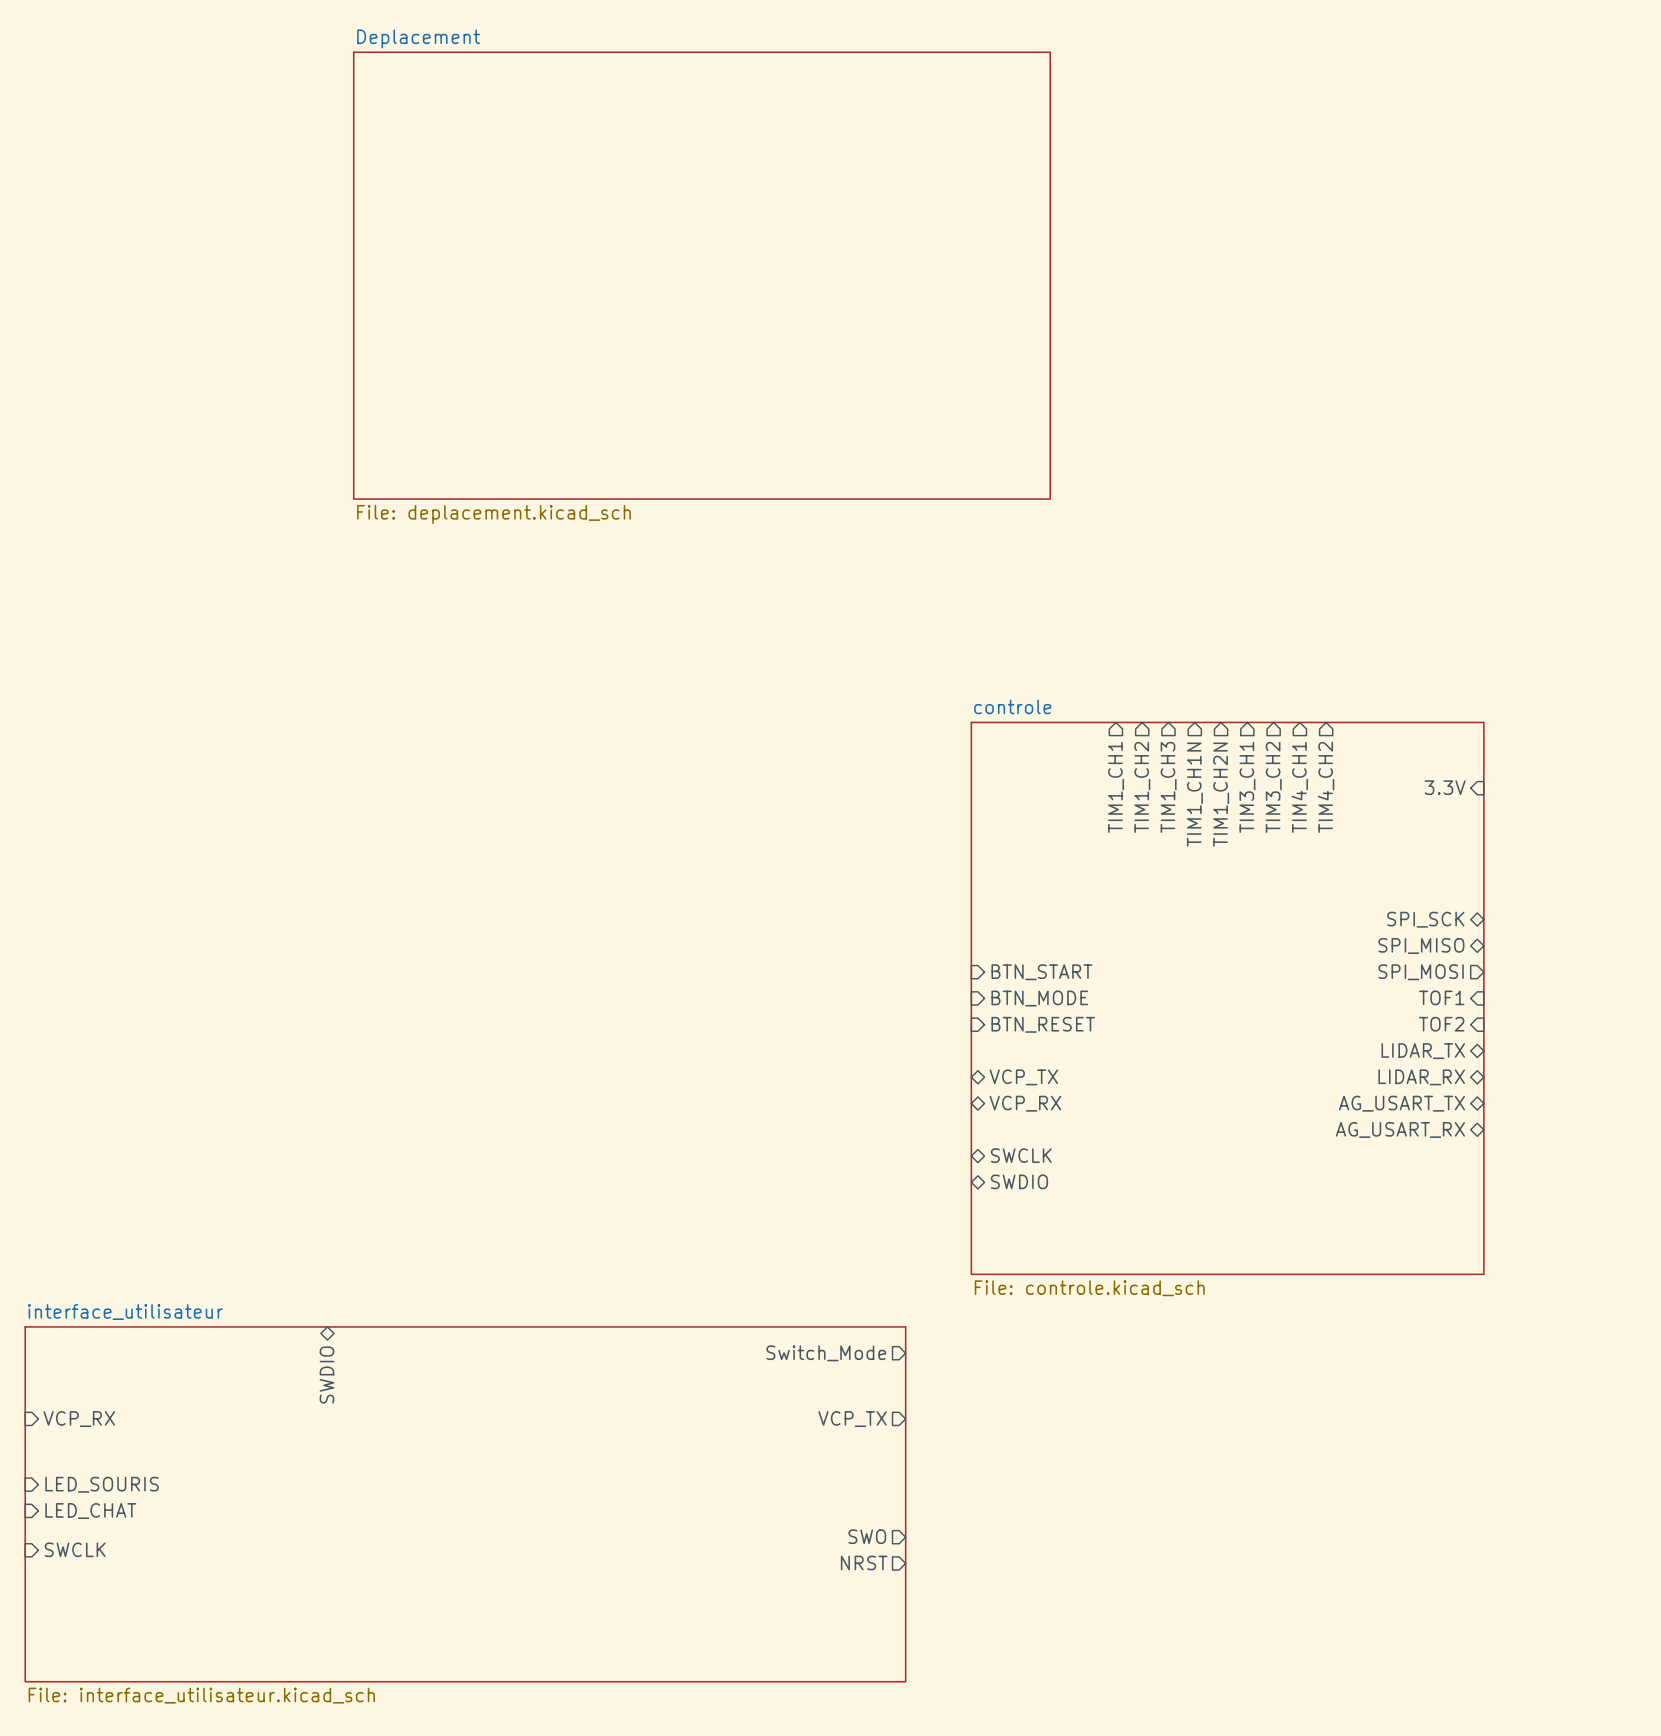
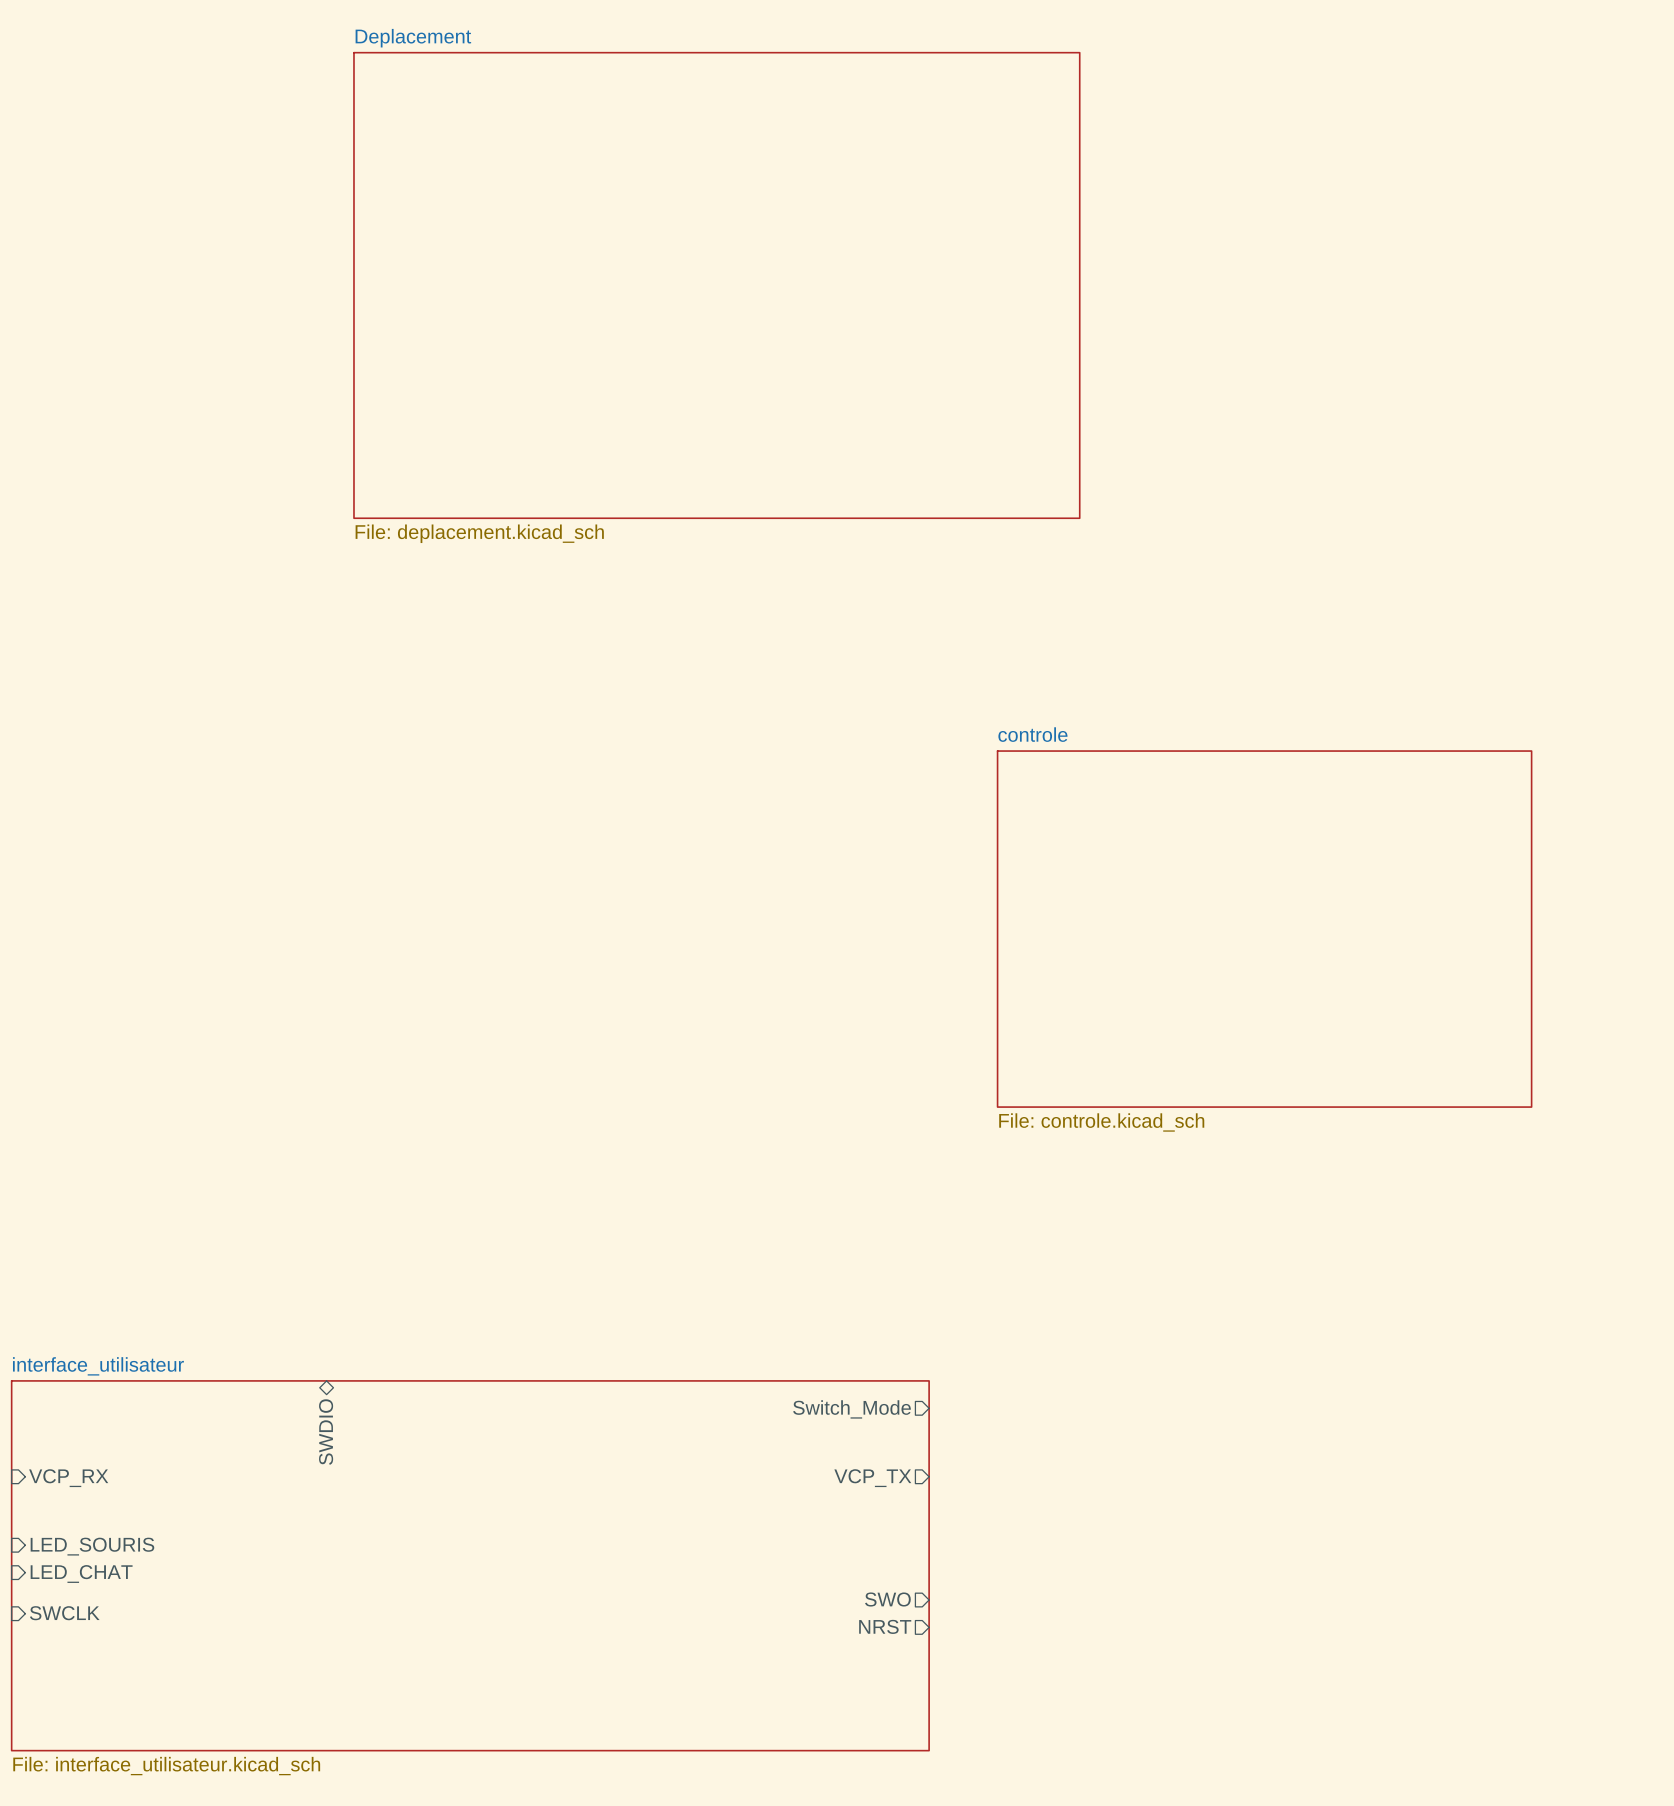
sheet pin: TIM1_CH1 (1116, 787) -> none
sheet pin: TIM1_CH2 (1142, 787) -> none
sheet pin: TIM1_CH3 (1168, 787) -> none
sheet pin: TIM3_CH1 (1247, 787) -> none
sheet pin: TIM3_CH2 (1273, 787) -> none
sheet pin: TIM4_CH1 (1299, 787) -> none
sheet pin: TIM4_CH2 (1325, 787) -> none
sheet pin: 3.3V (1445, 787) -> none
sheet pin: TIM1_CH1N (1194, 794) -> none
sheet pin: TIM1_CH2N (1221, 794) -> none
sheet controle: none -> File: controle.kicad_sch (1264, 929)
sheet pin: SPI_SCK (1425, 919) -> none
sheet pin: SPI_MISO (1421, 945) -> none
sheet pin: BTN_START (1041, 972) -> none
sheet pin: SPI_MOSI (1421, 972) -> none
sheet pin: TOF1 (1441, 997) -> none
sheet pin: BTN_MODE (1039, 998) -> none
sheet controle: File: controle.kicad_sch (1227, 998) -> none
sheet pin: BTN_RESET (1043, 1024) -> none
sheet pin: TOF2 (1441, 1024) -> none
sheet pin: LIDAR_TX (1423, 1051) -> none
sheet pin: VCP_TX (1023, 1077) -> none
sheet pin: LIDAR_RX (1421, 1077) -> none
sheet pin: VCP_RX (1025, 1103) -> none
sheet pin: AG_USART_TX (1401, 1103) -> none
sheet pin: AG_USART_RX (1400, 1129) -> none
sheet pin: SWCLK (1021, 1155) -> none
sheet pin: SWDIO (1019, 1181) -> none

